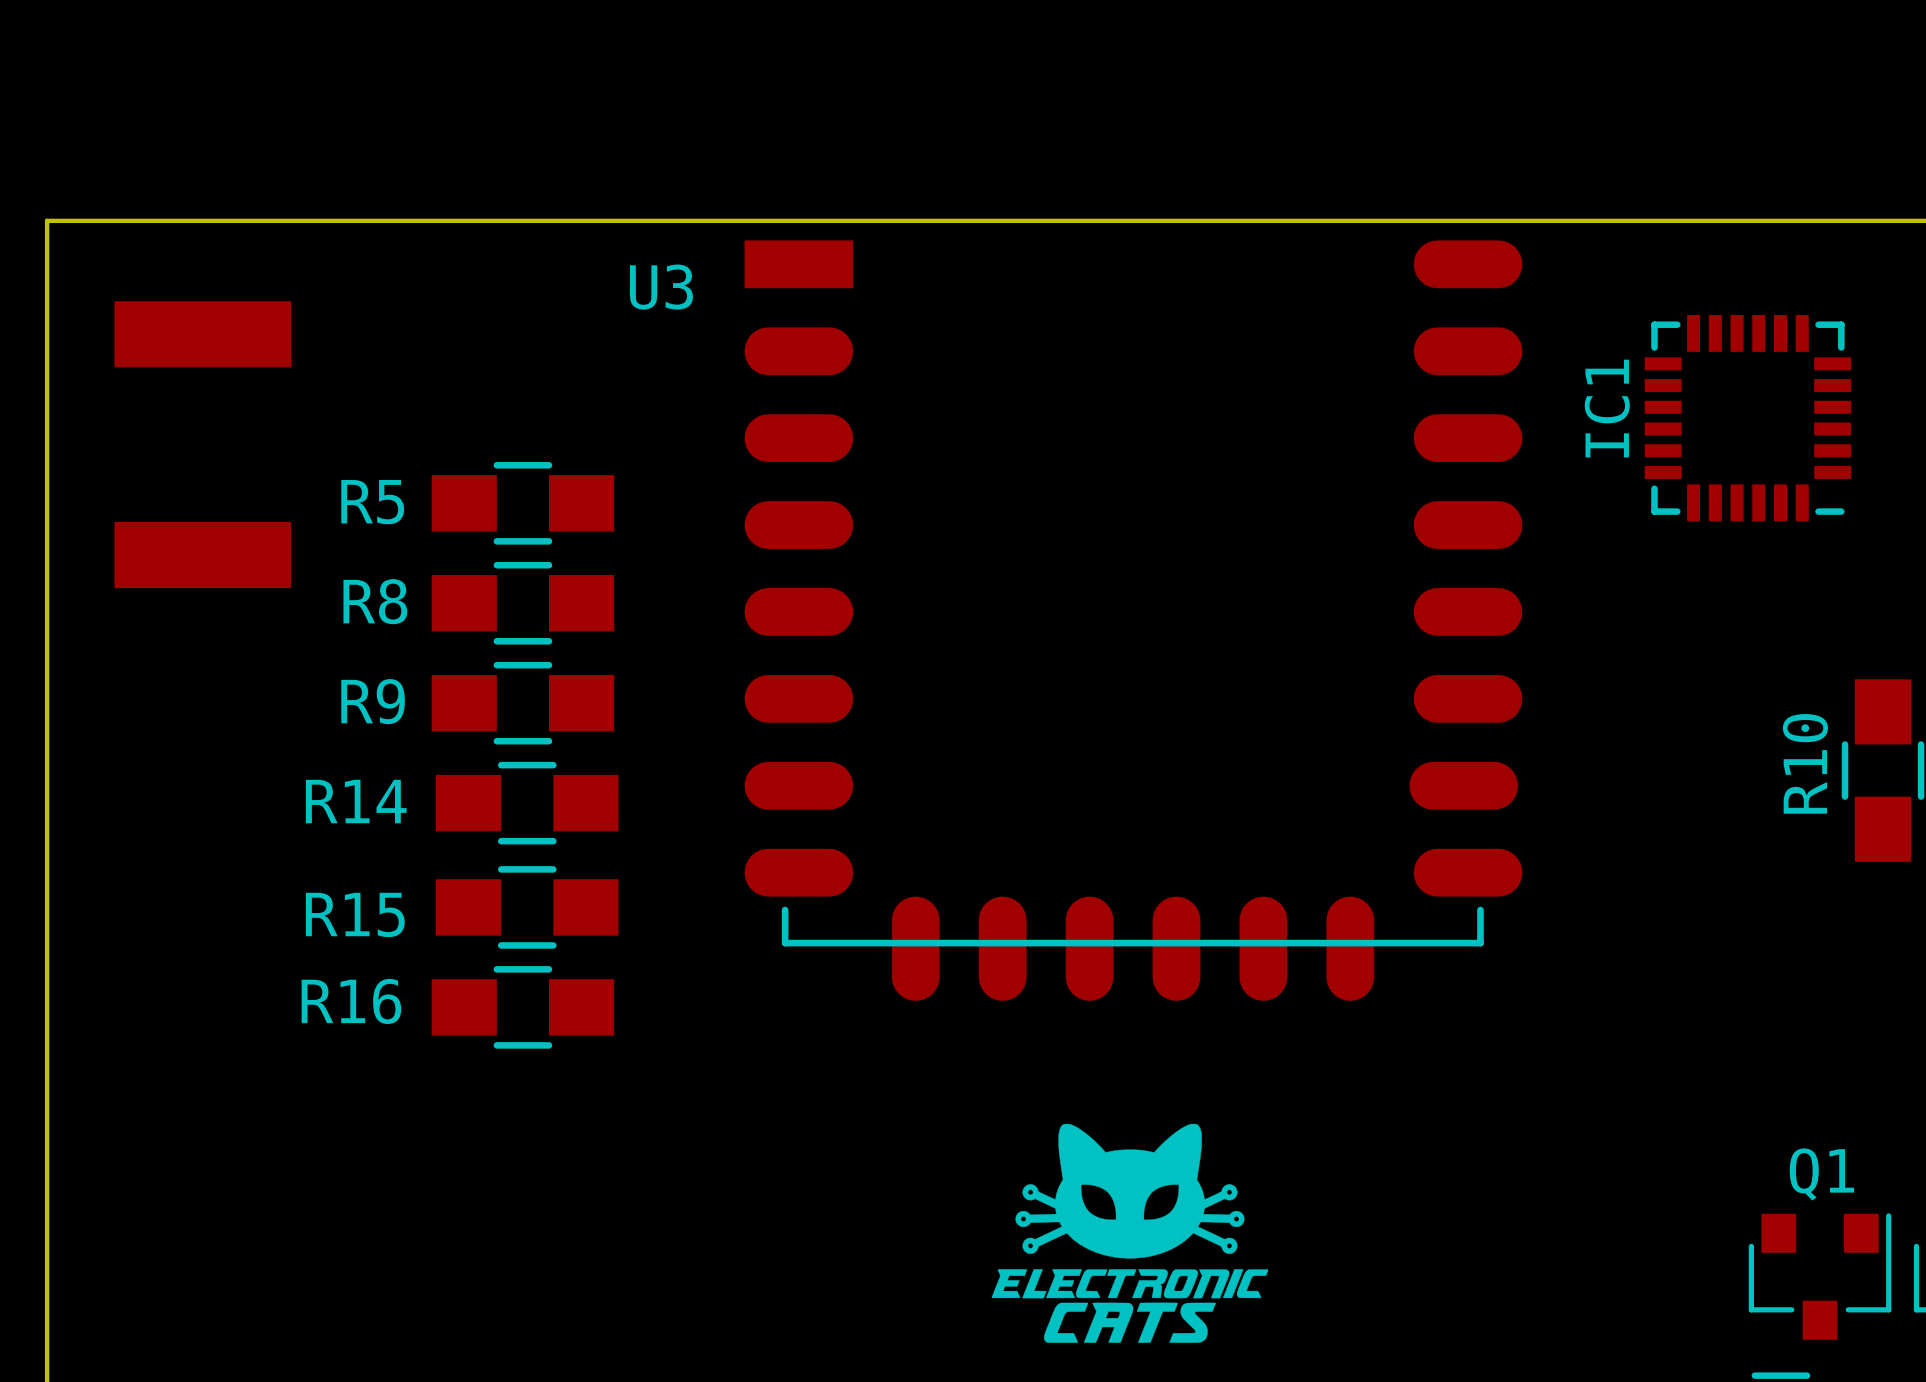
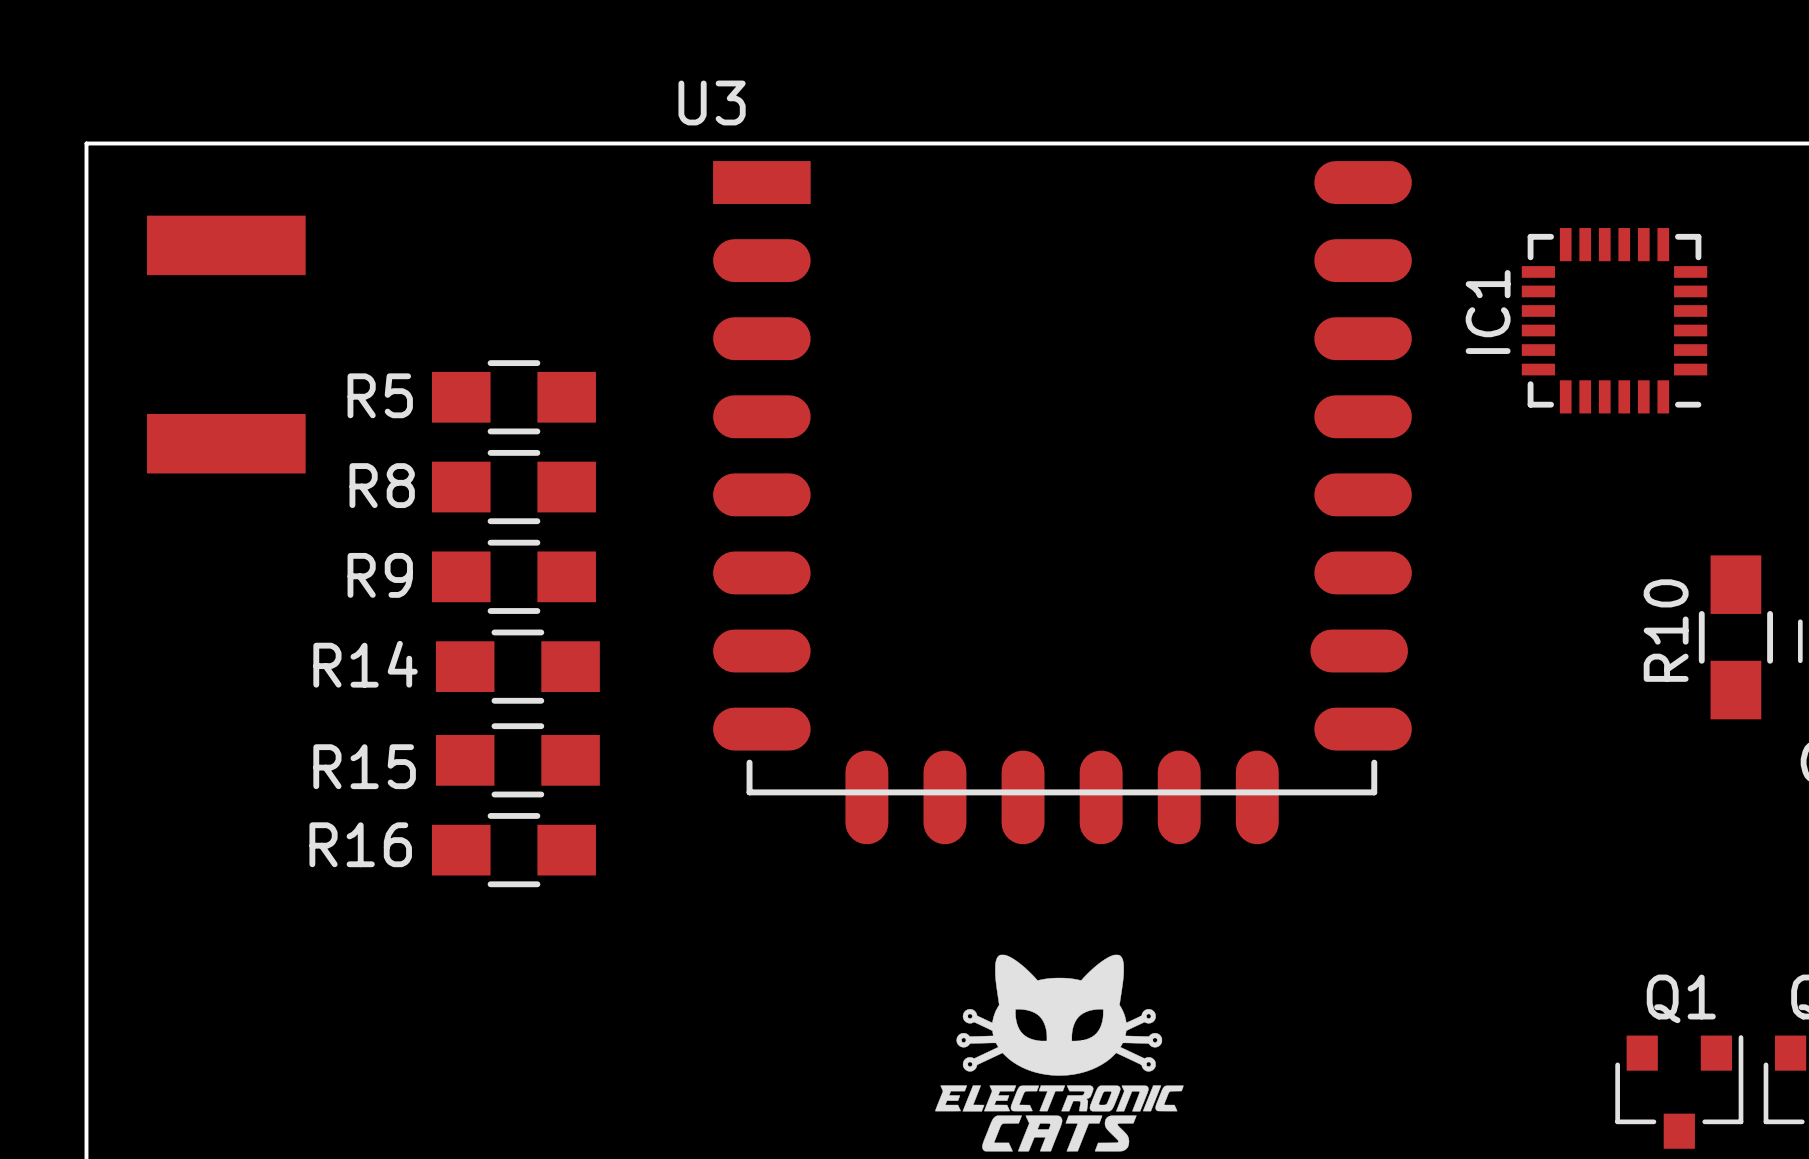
U3 name position: U3 (661, 287) -> U3 (712, 103)

